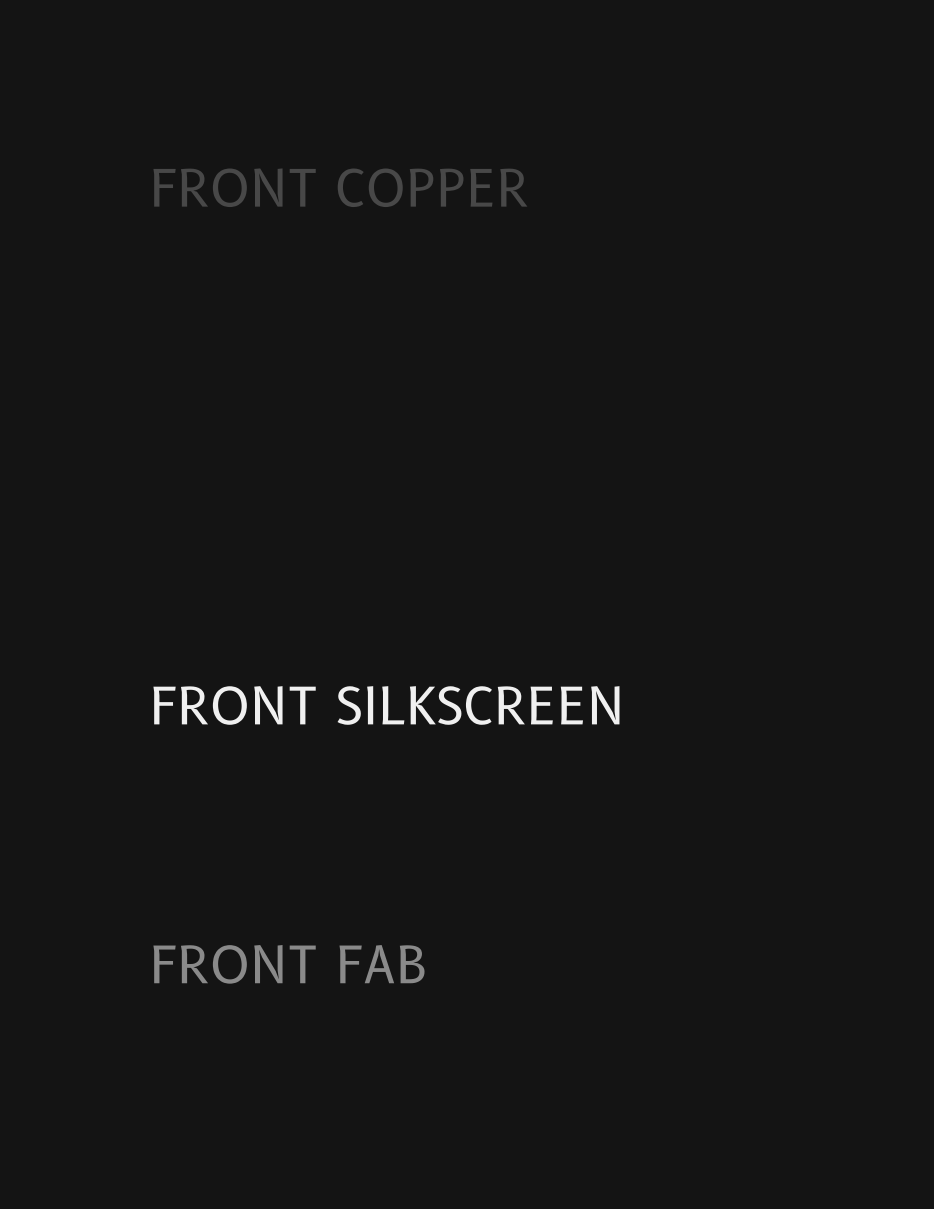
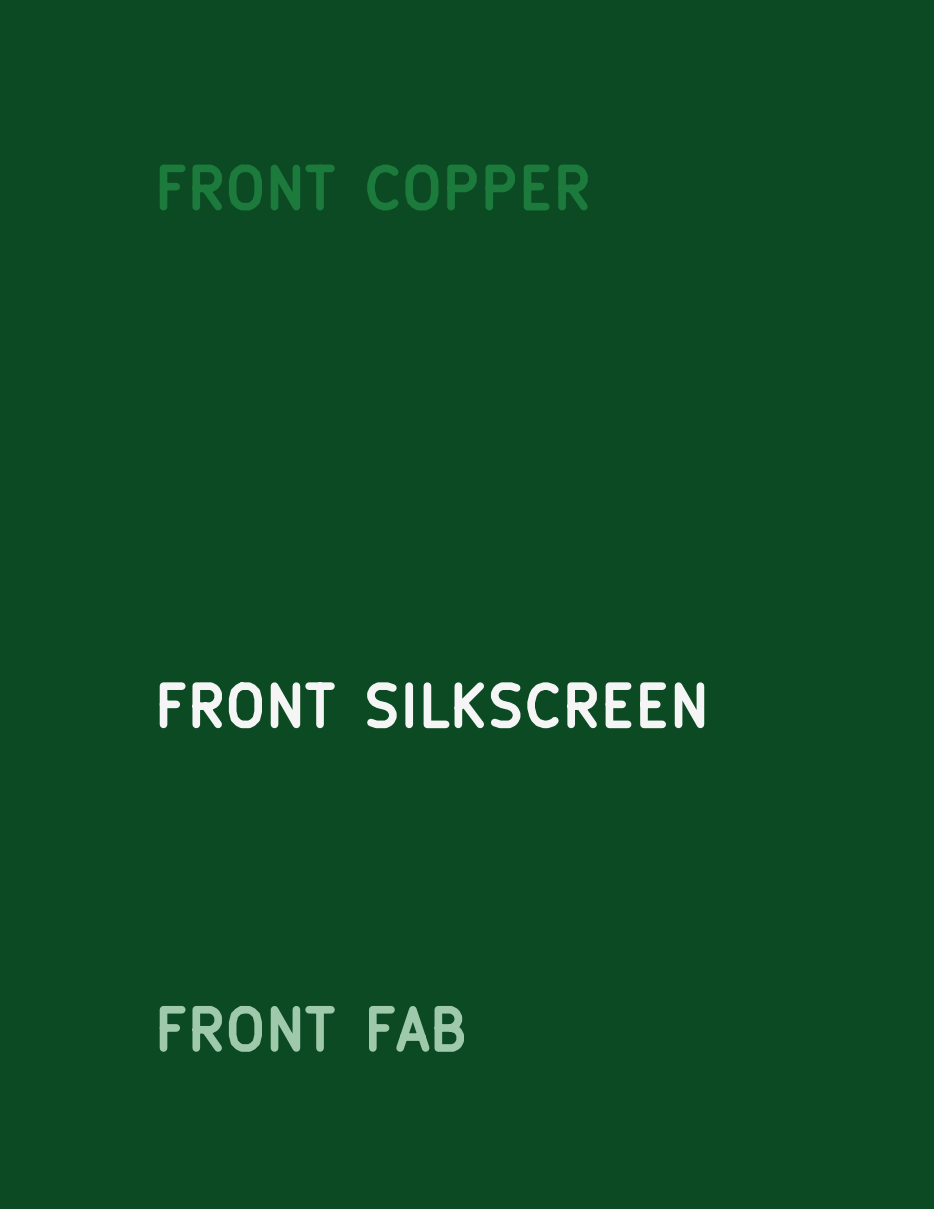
text position: FRONT FAB (288, 964) -> FRONT FAB (311, 1028)

